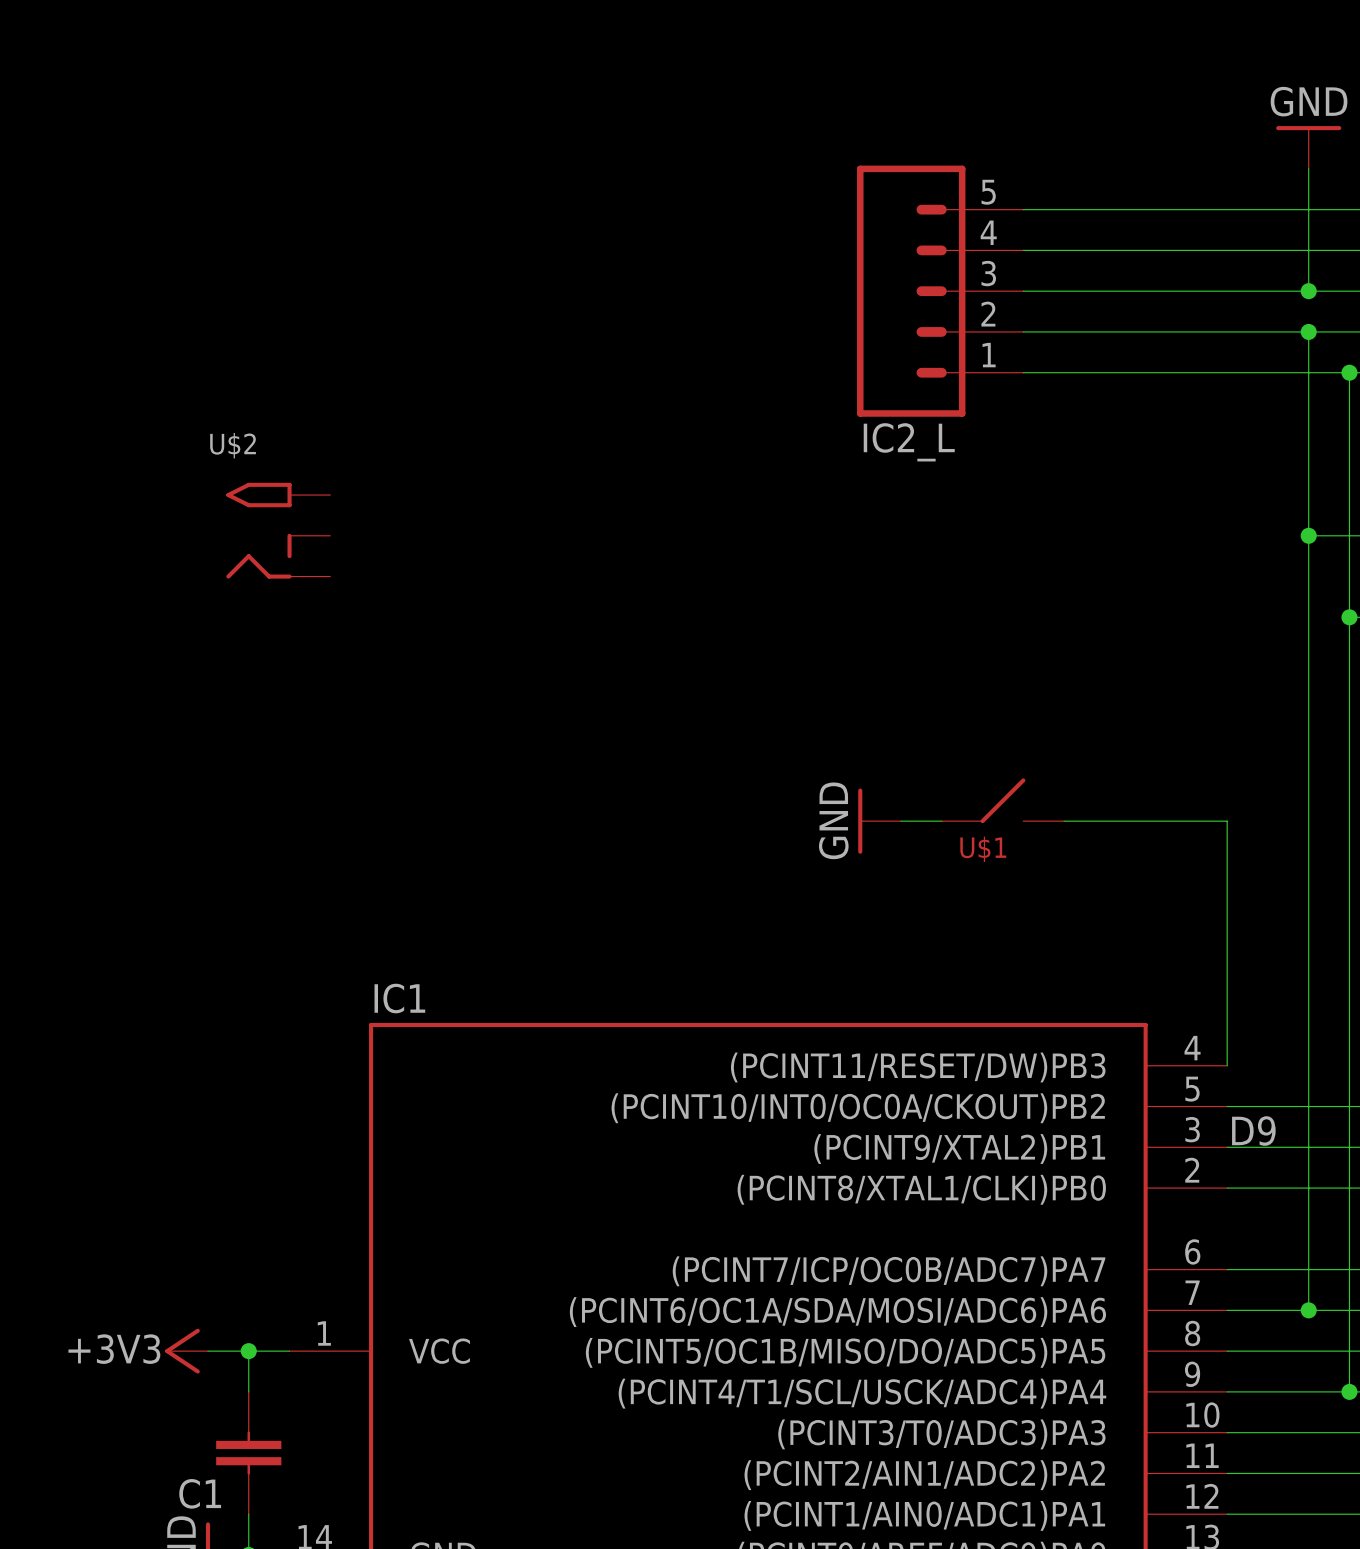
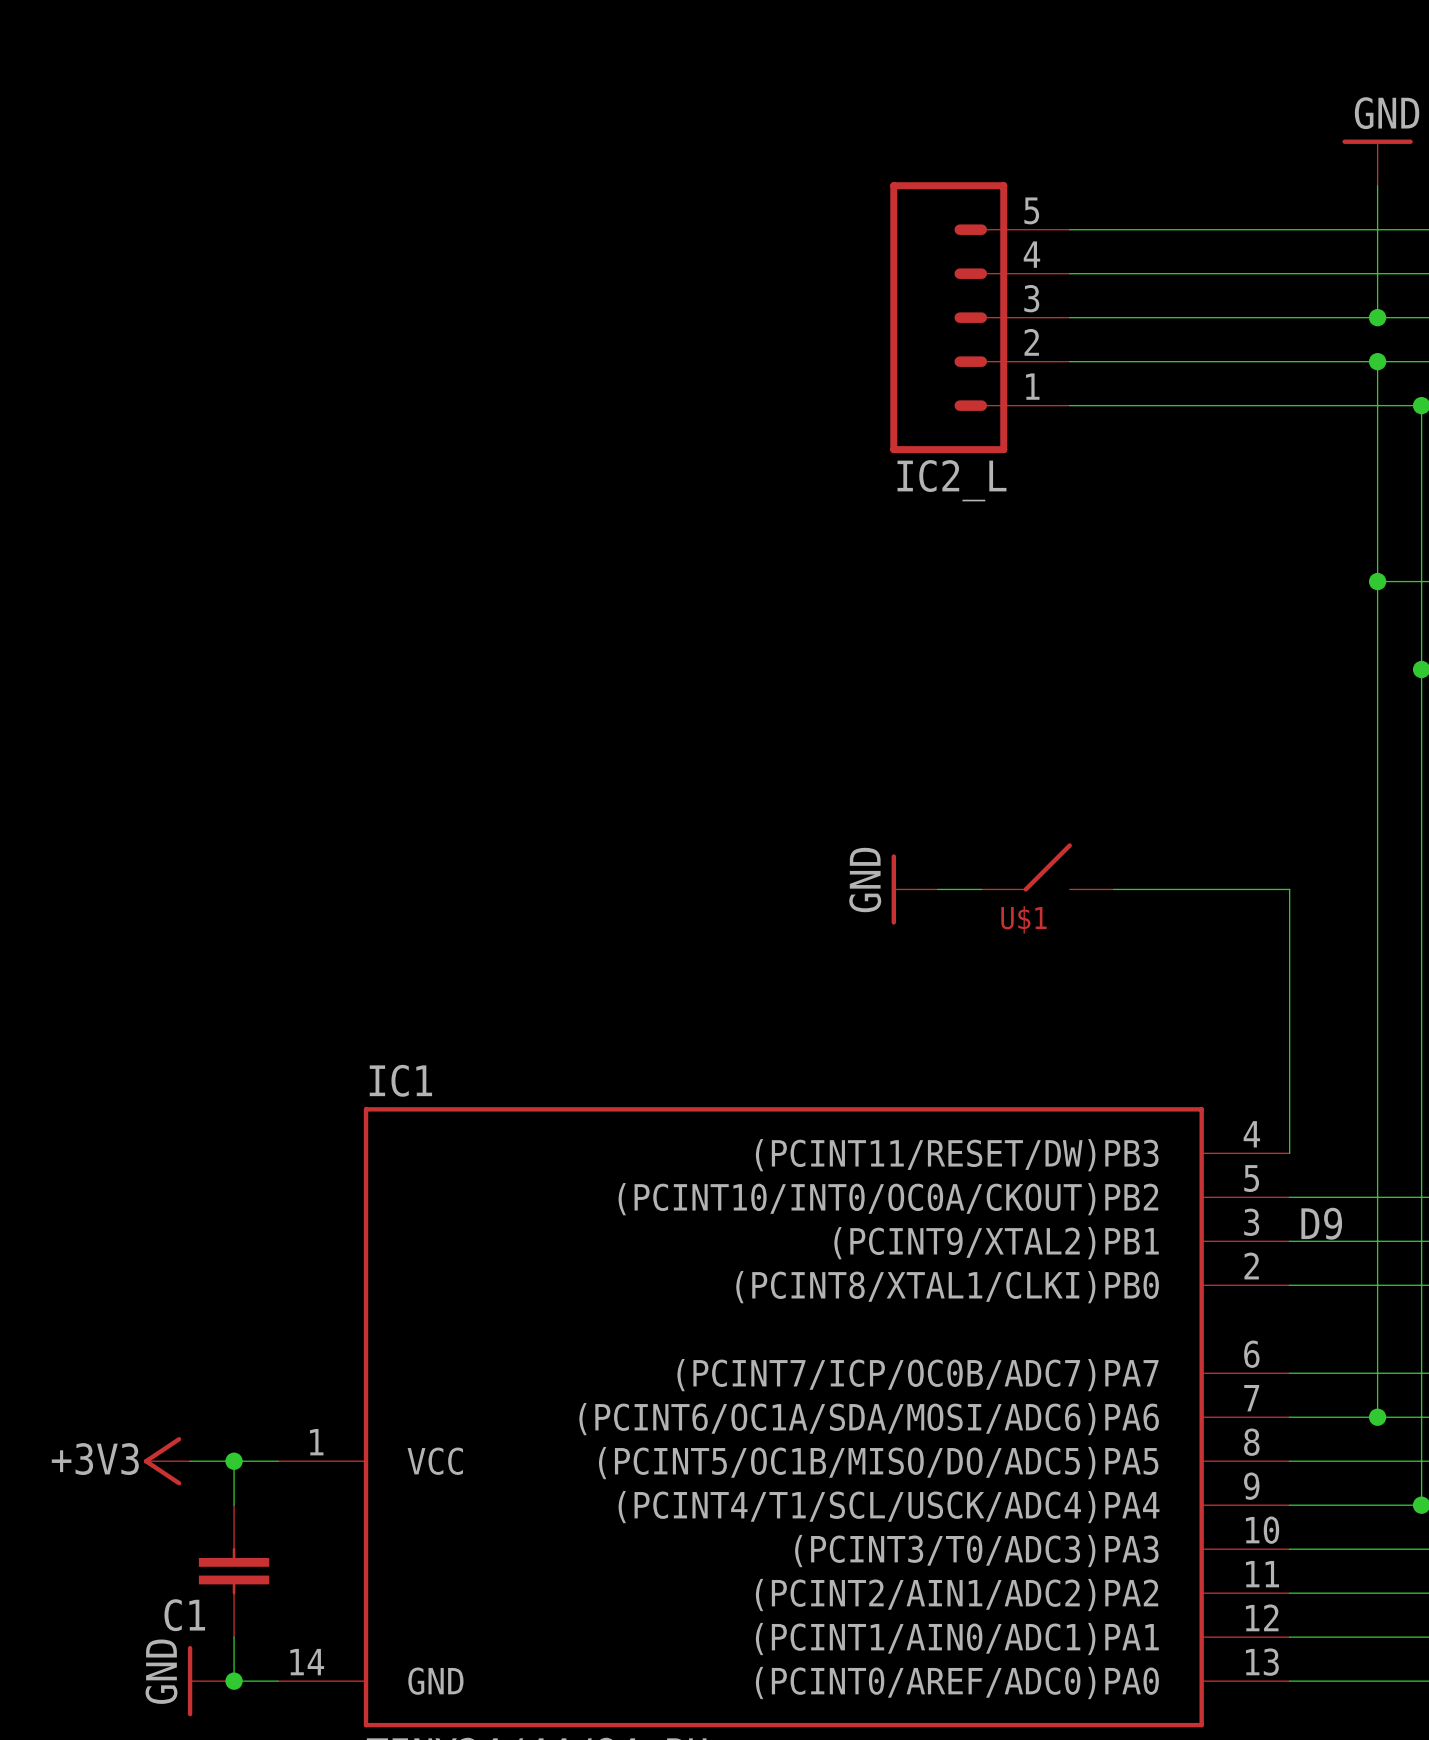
U$2: (278, 530) -> none

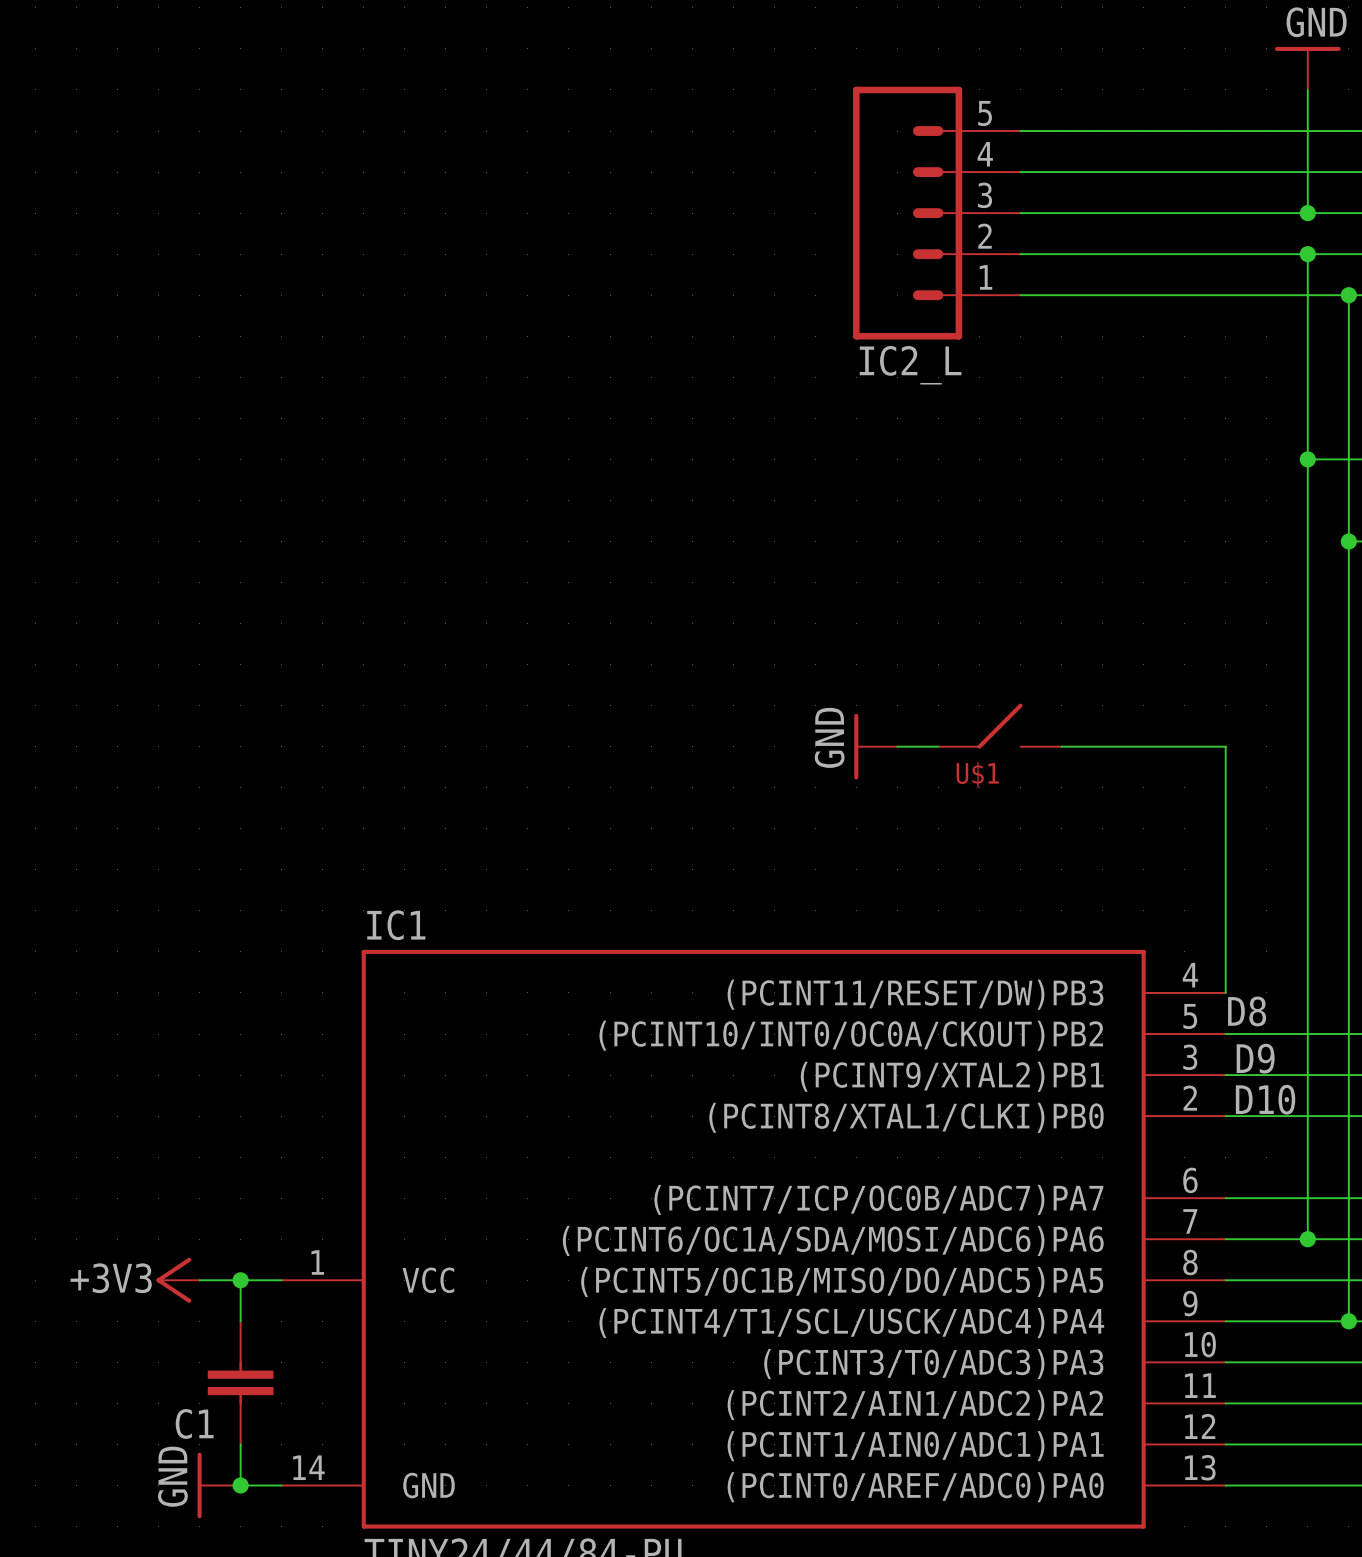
label: none -> D8 (1247, 1011)
label: none -> D10 (1265, 1099)

